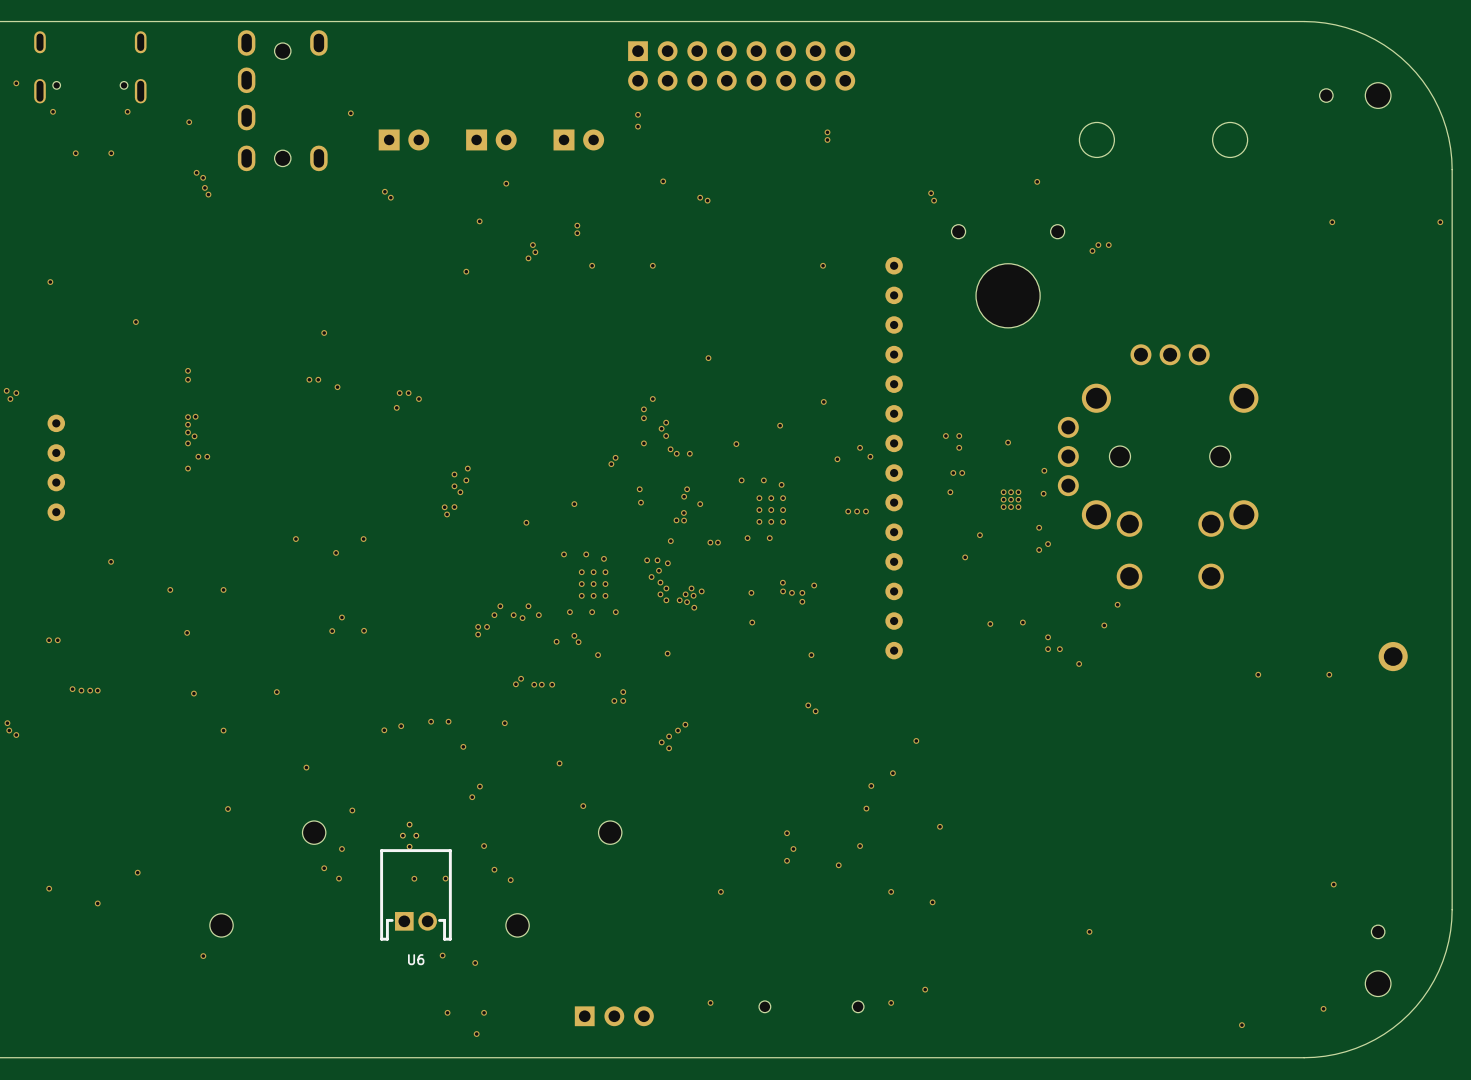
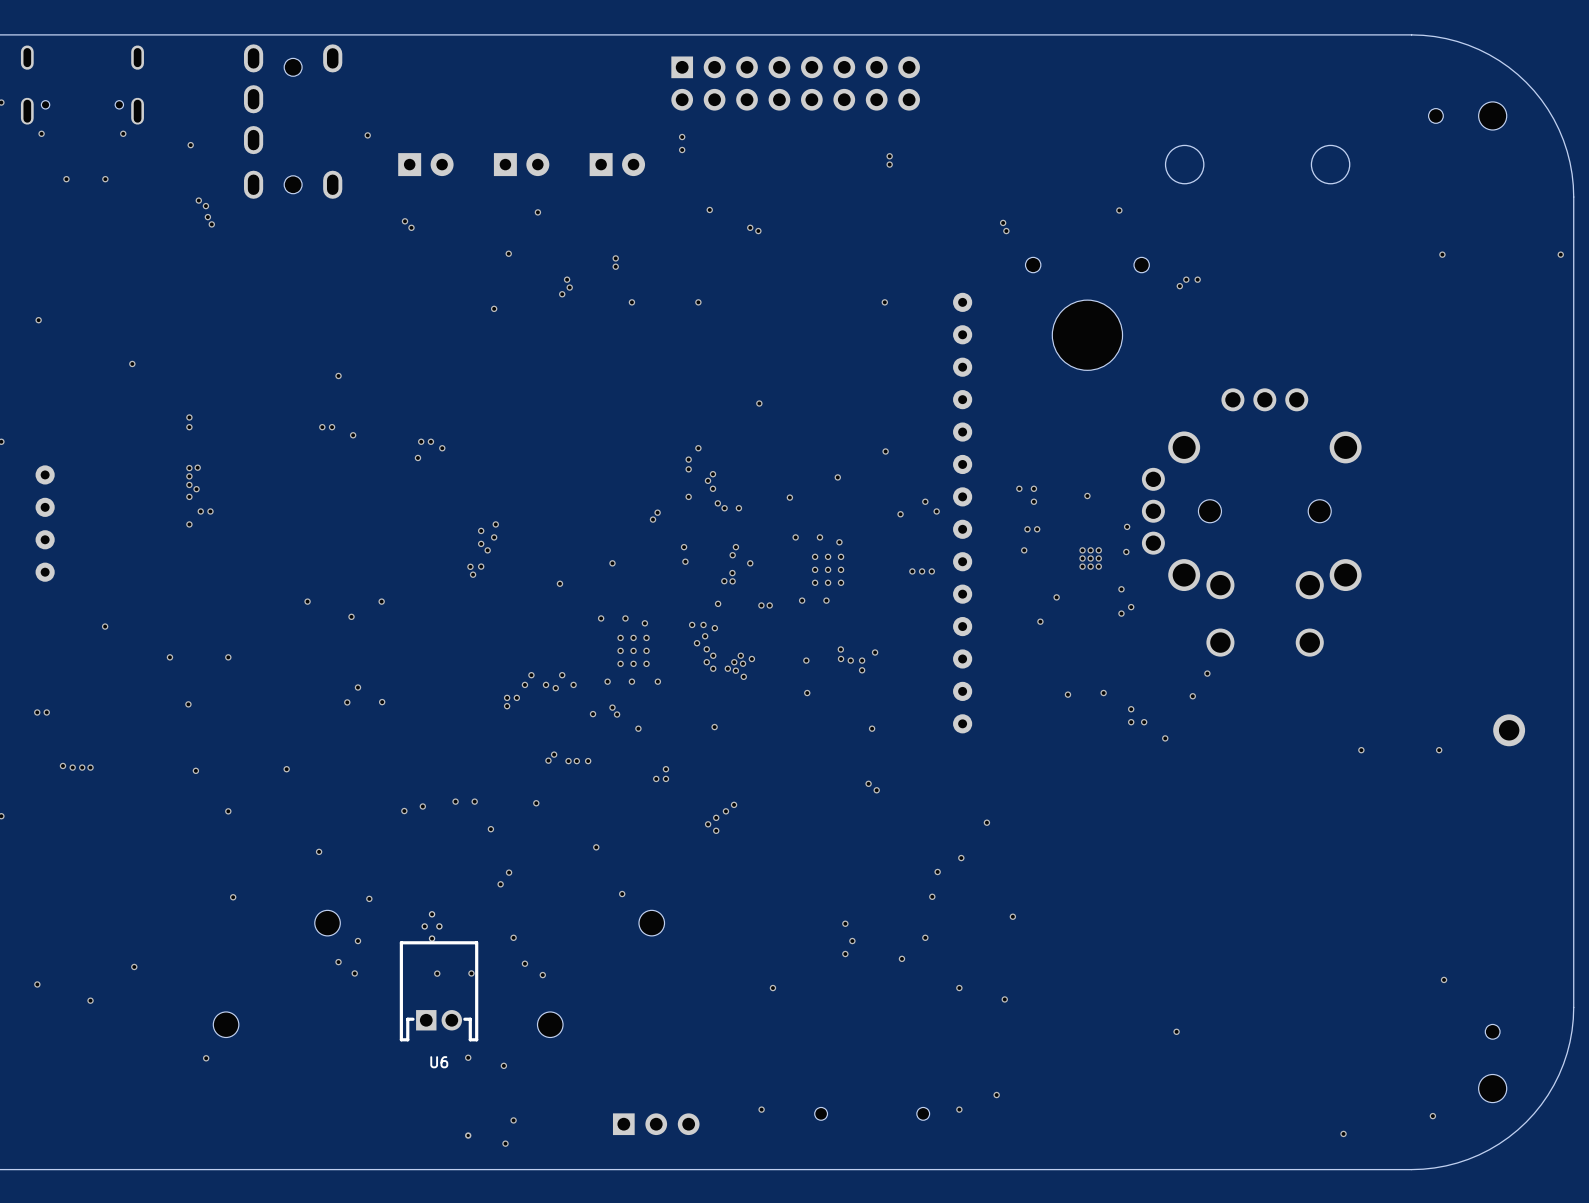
via: (447, 1012) -> none
via: none -> (468, 1135)

